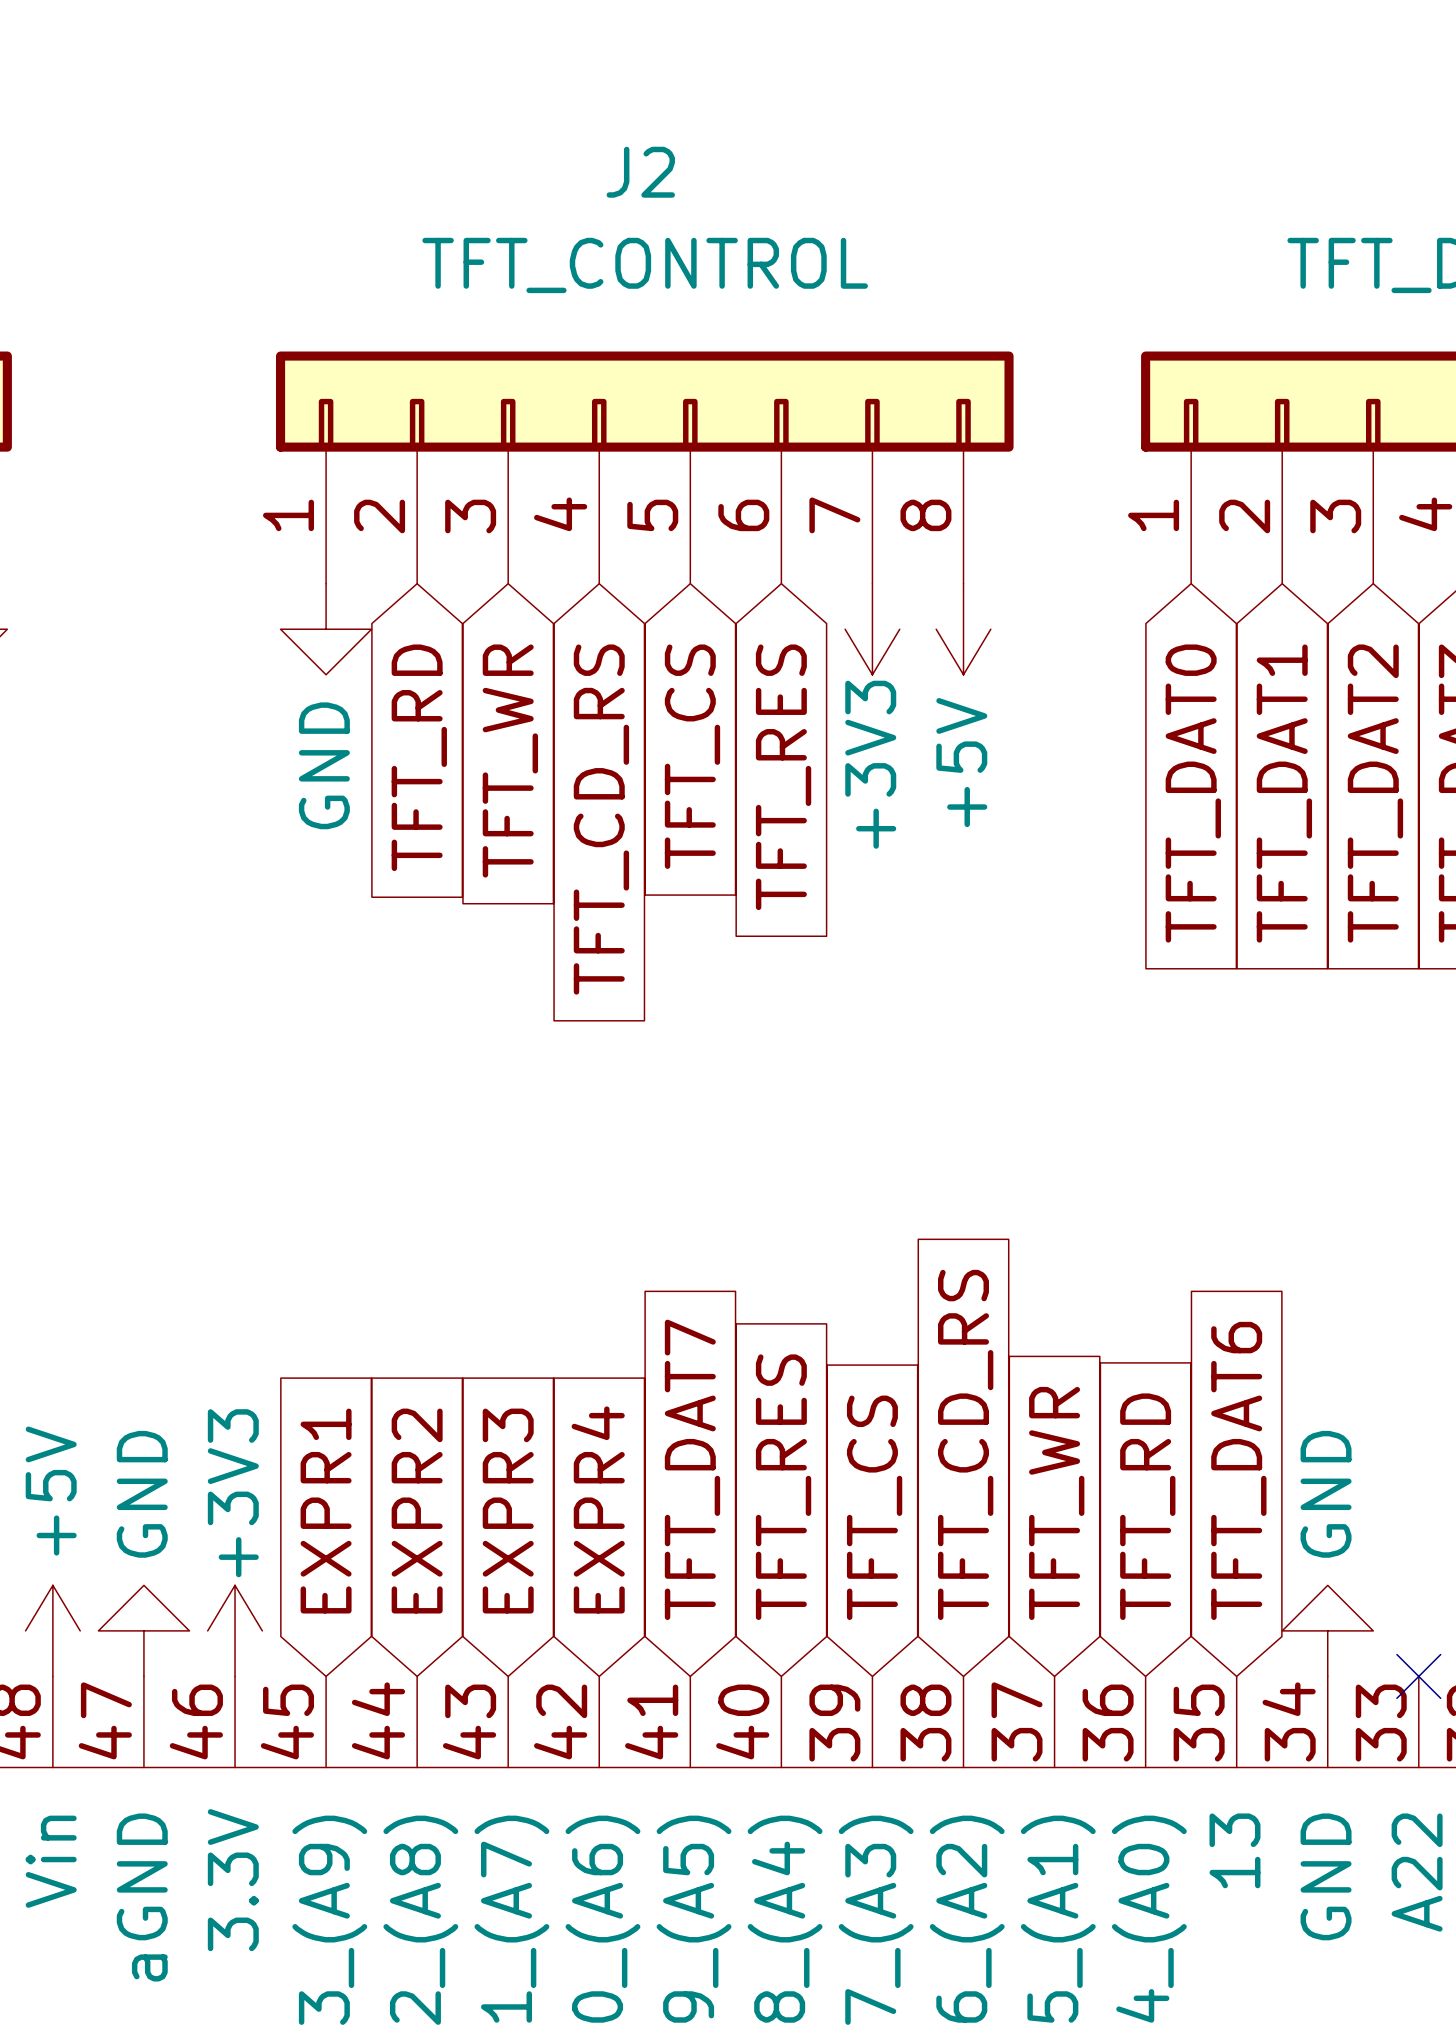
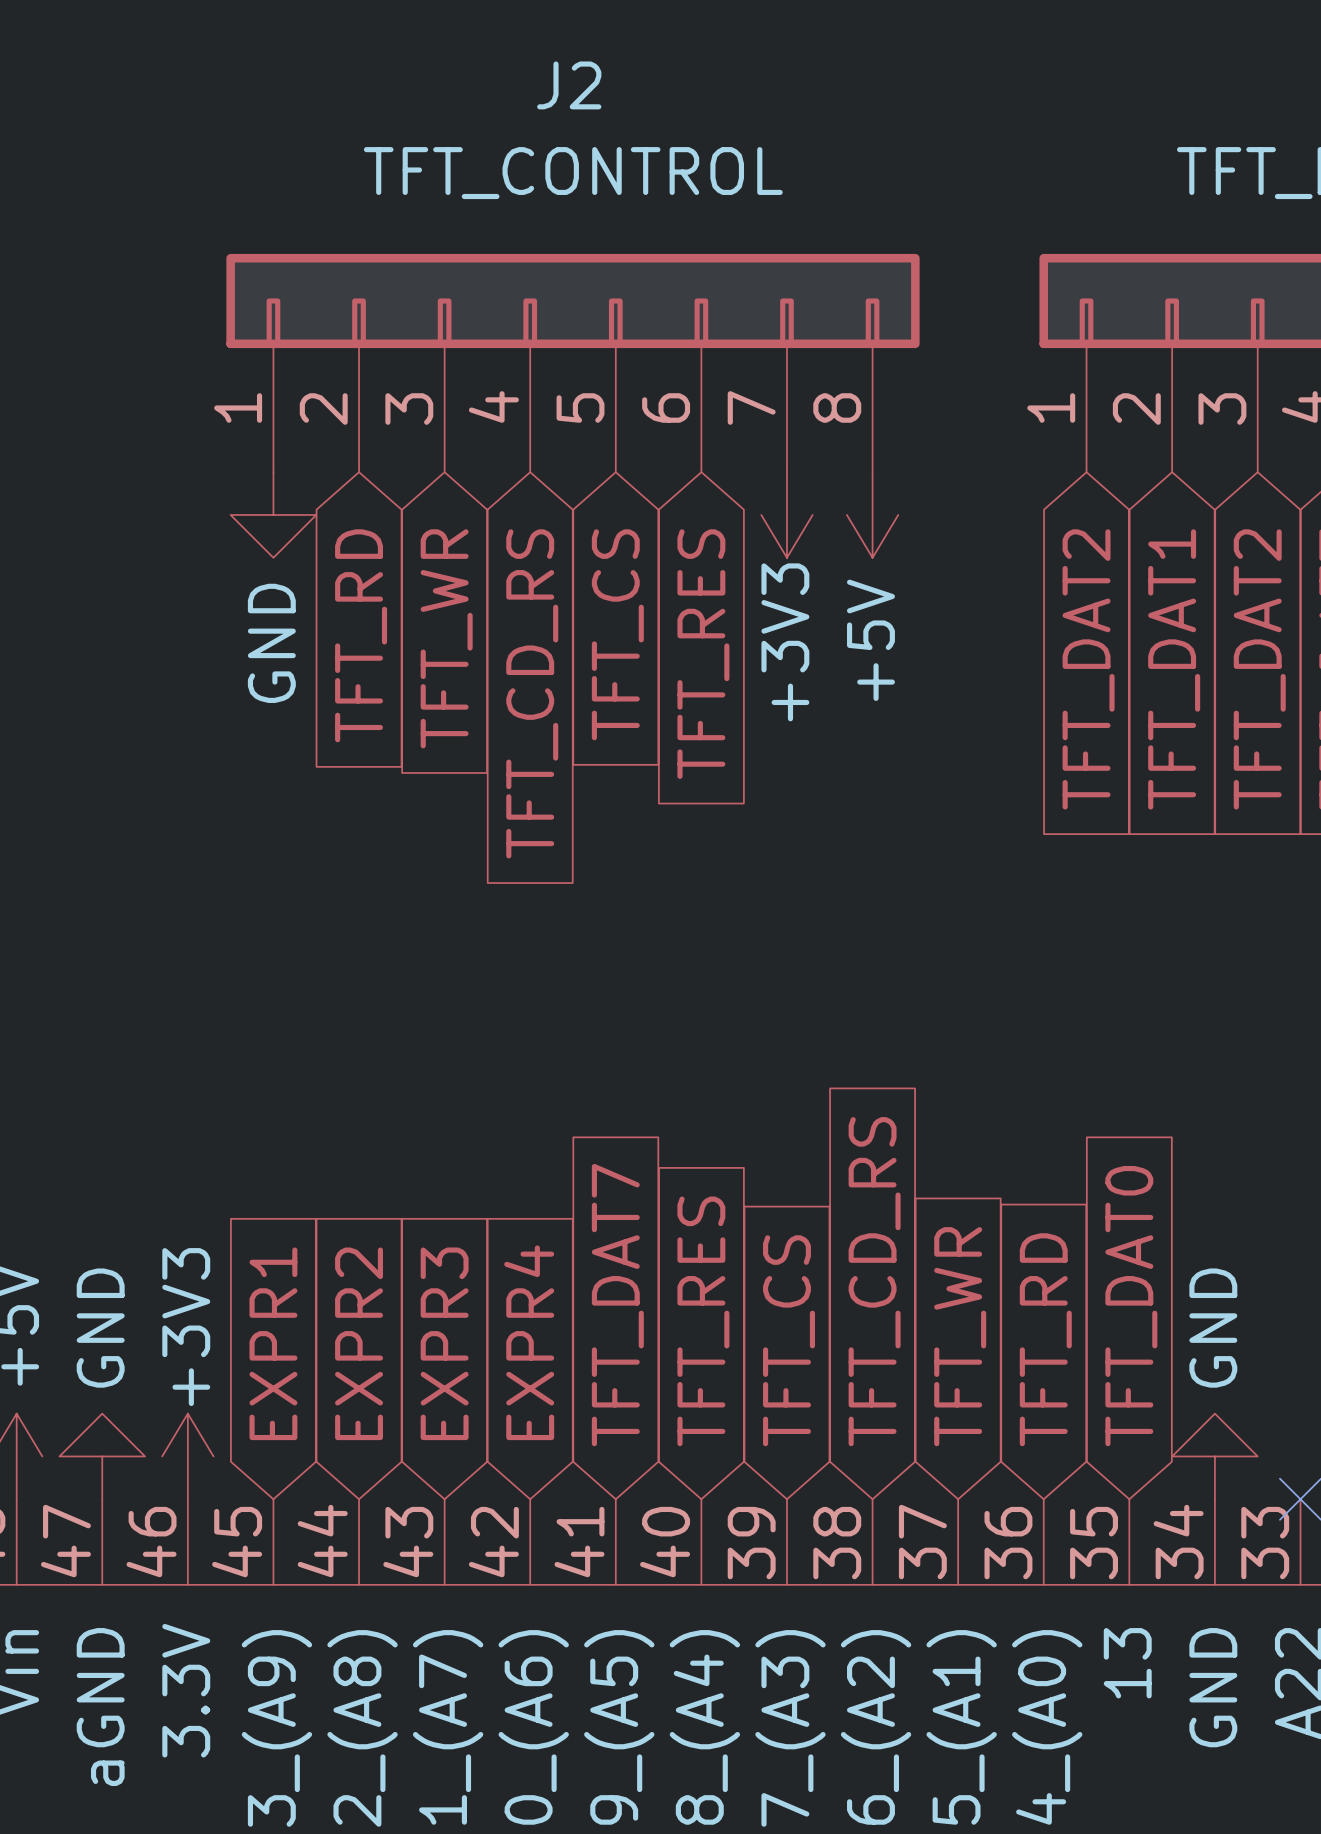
global label: TFT_DAT0 (1193, 793) -> TFT_DAT2 (1088, 669)
global label: TFT_DAT6 (1238, 1470) -> TFT_DAT0 (1131, 1306)

